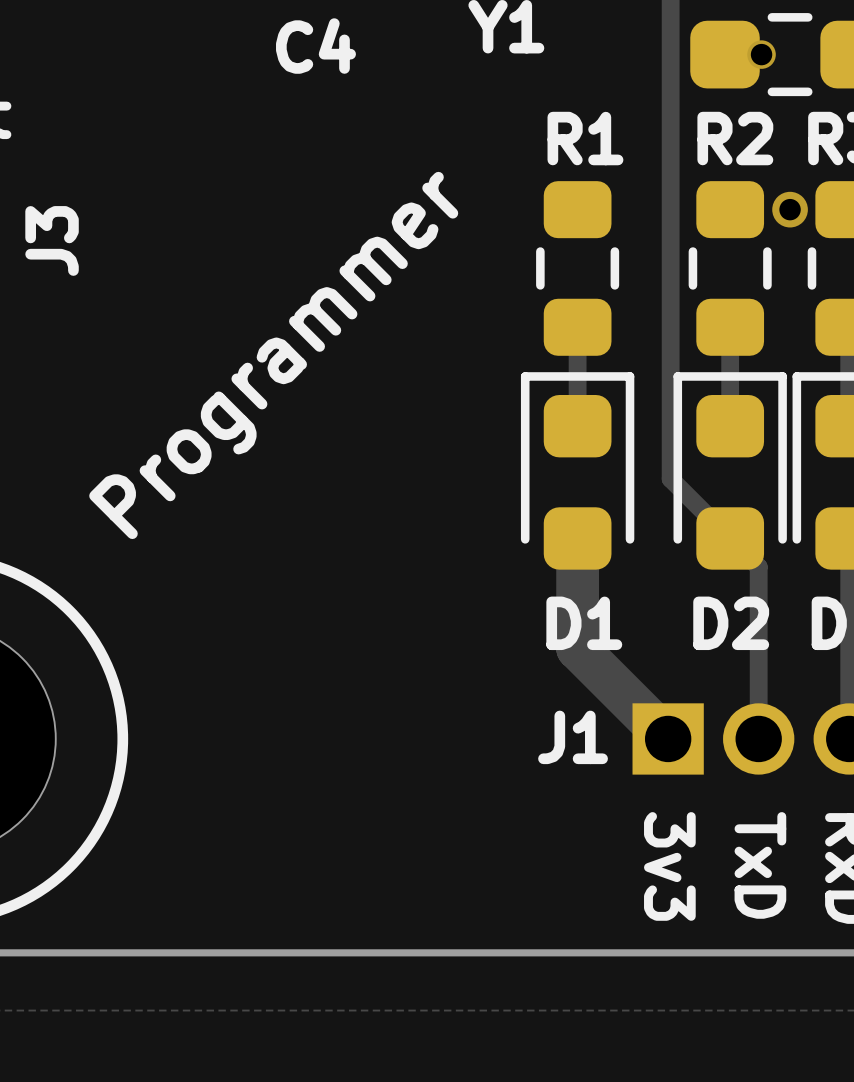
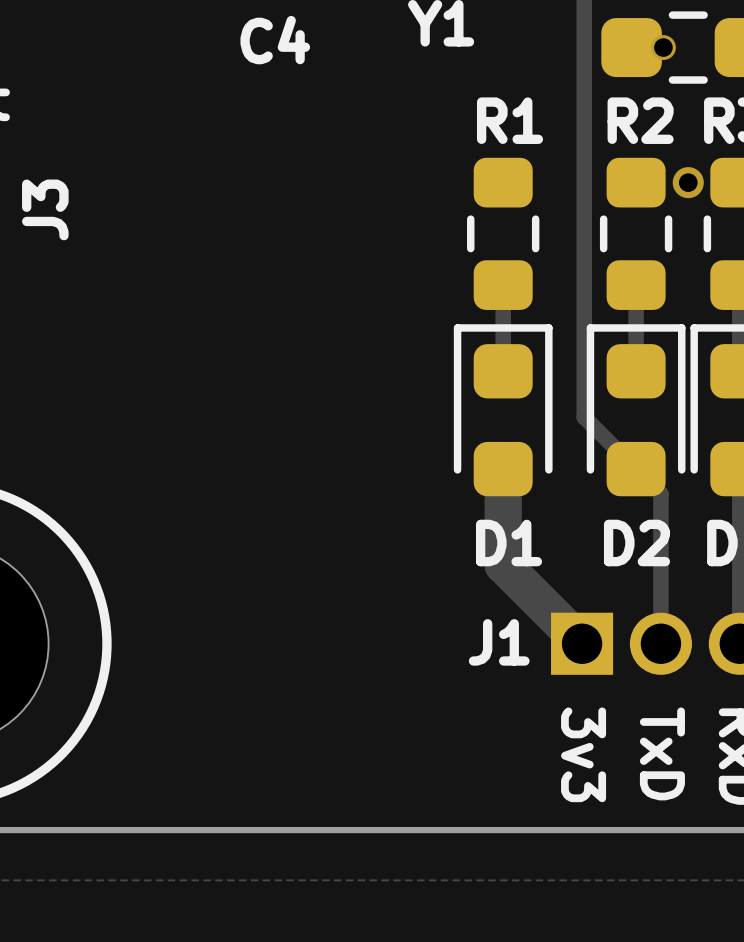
text: Programmer (273, 355) -> none

